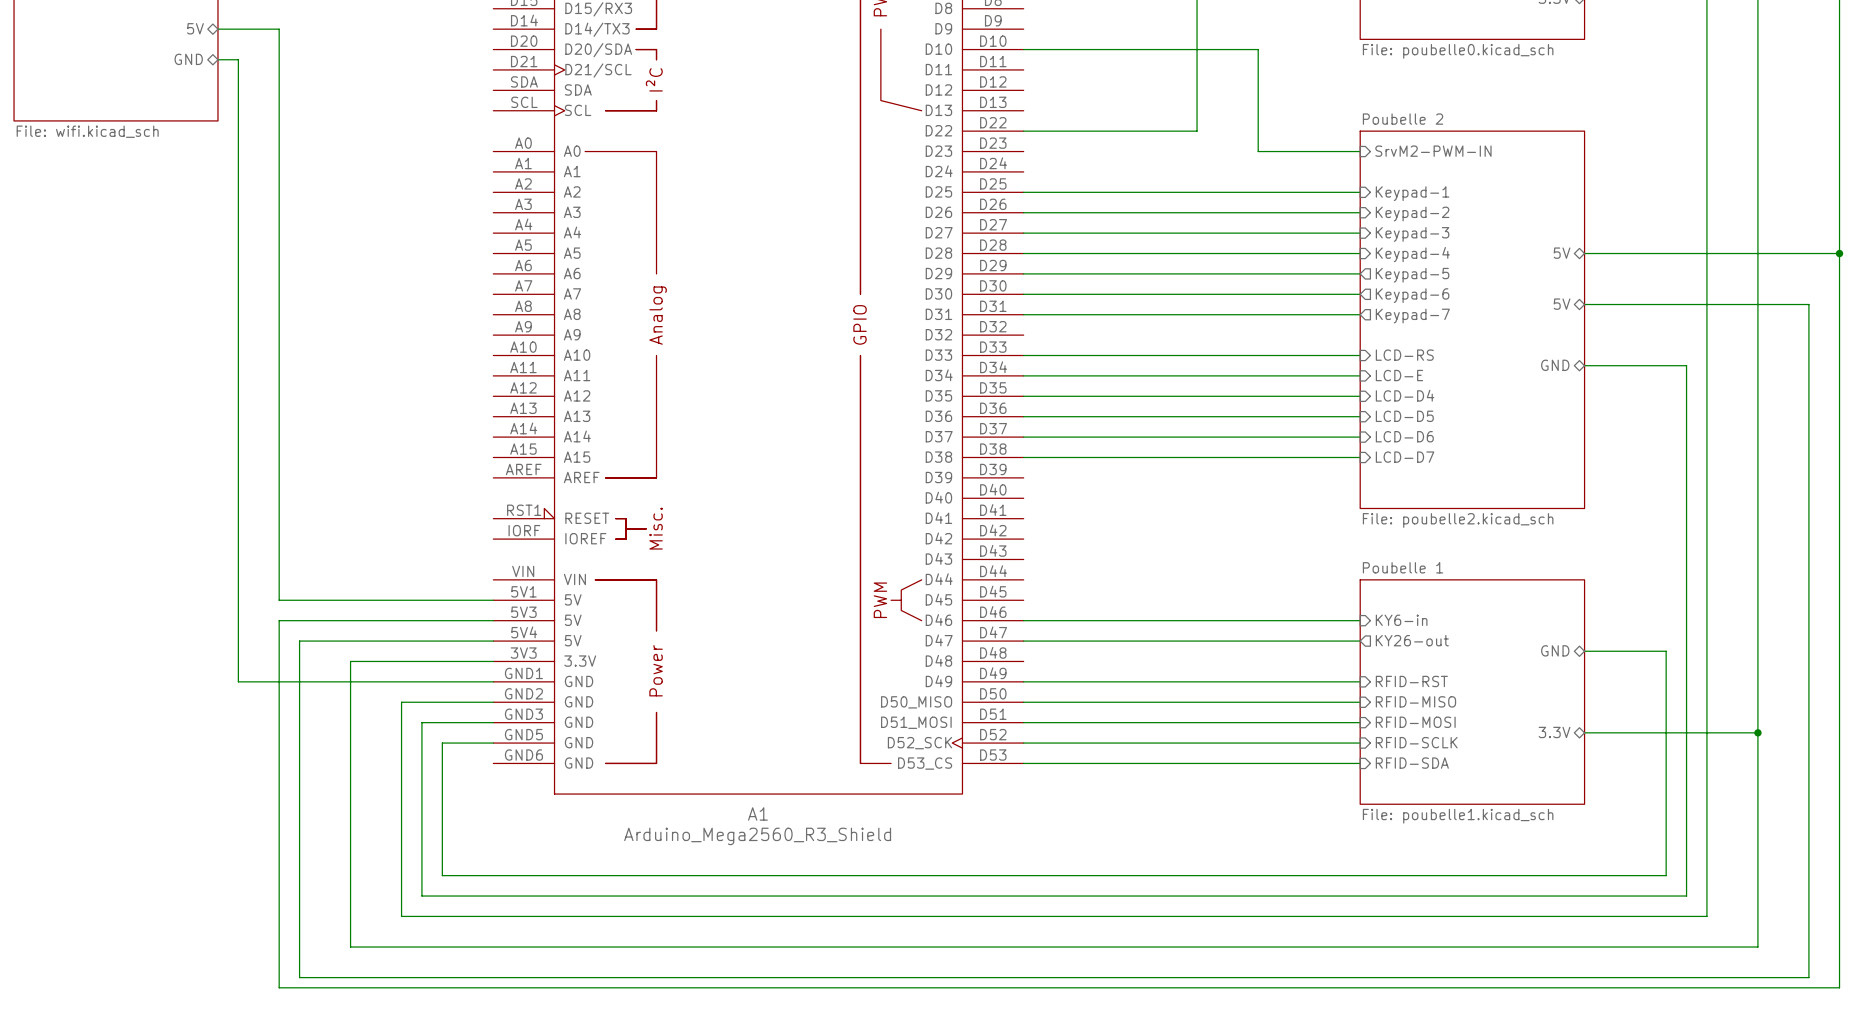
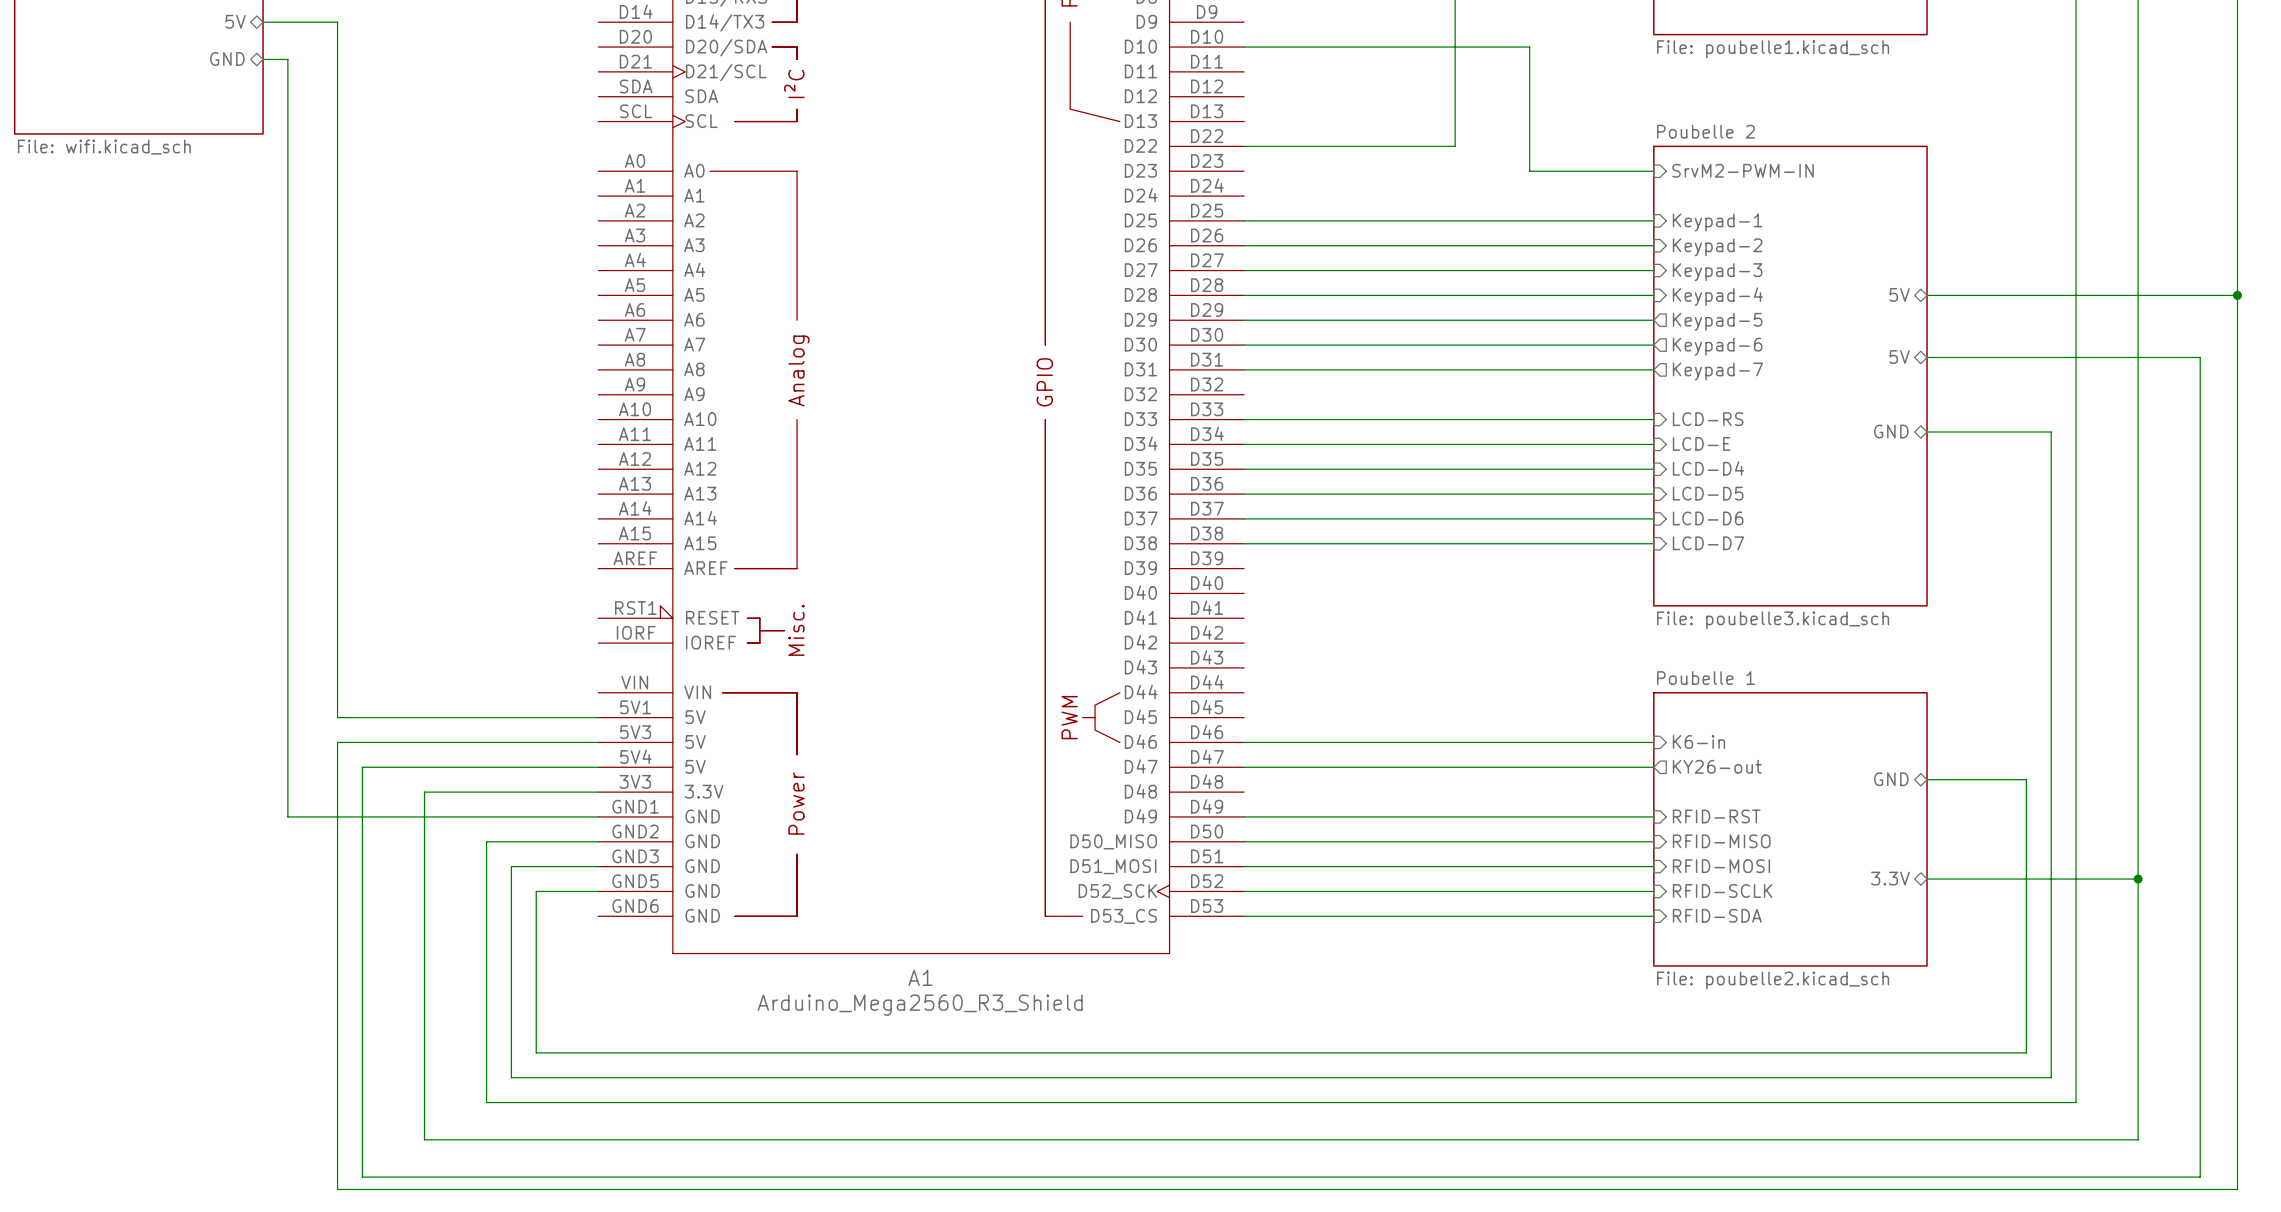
sheet value: File: poubelle0.kicad_sch (1458, 51) -> File: poubelle1.kicad_sch (1773, 49)
sheet Poubelle 2 value: File: poubelle2.kicad_sch (1458, 520) -> File: poubelle3.kicad_sch (1773, 620)
sheet pin: KY6-in (1401, 620) -> K6-in (1698, 741)
sheet Poubelle 1 value: File: poubelle1.kicad_sch (1458, 816) -> File: poubelle2.kicad_sch (1773, 980)

